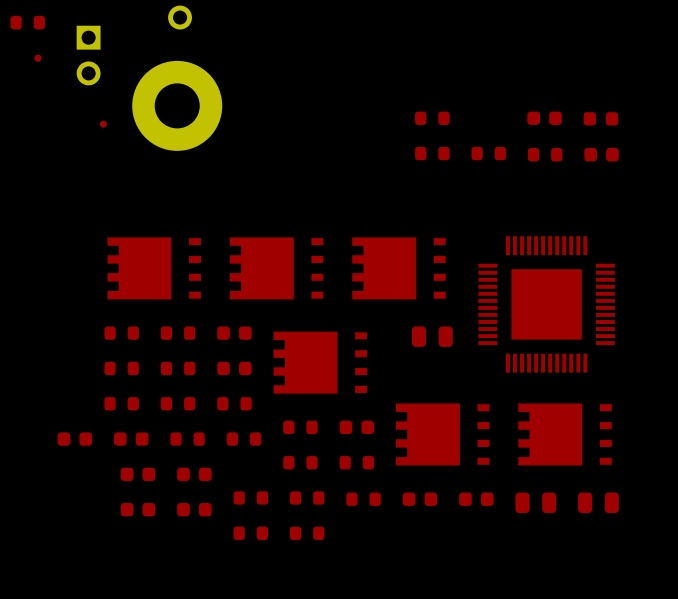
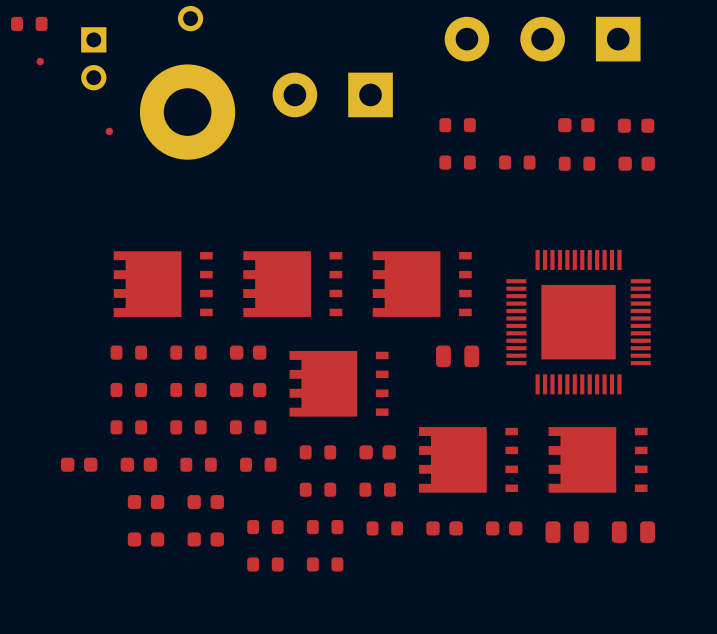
part: none -> (542, 39)
part: none -> (332, 94)

